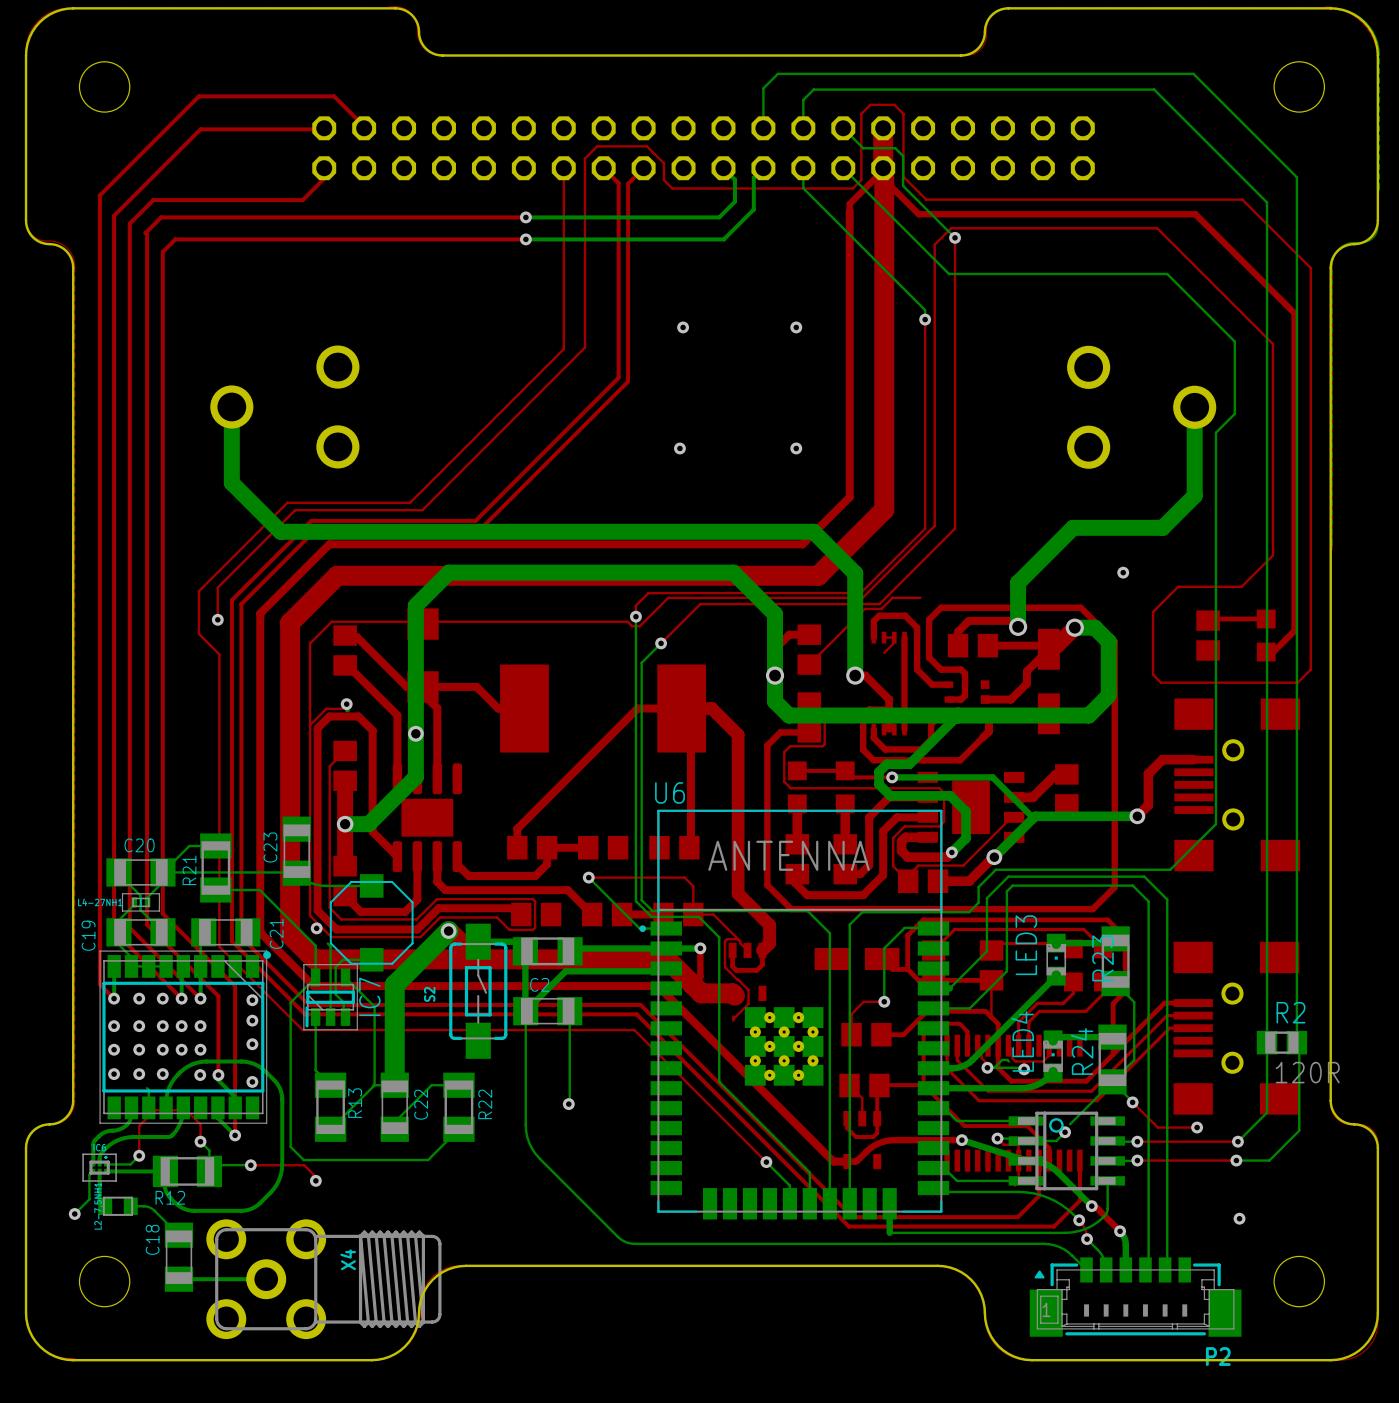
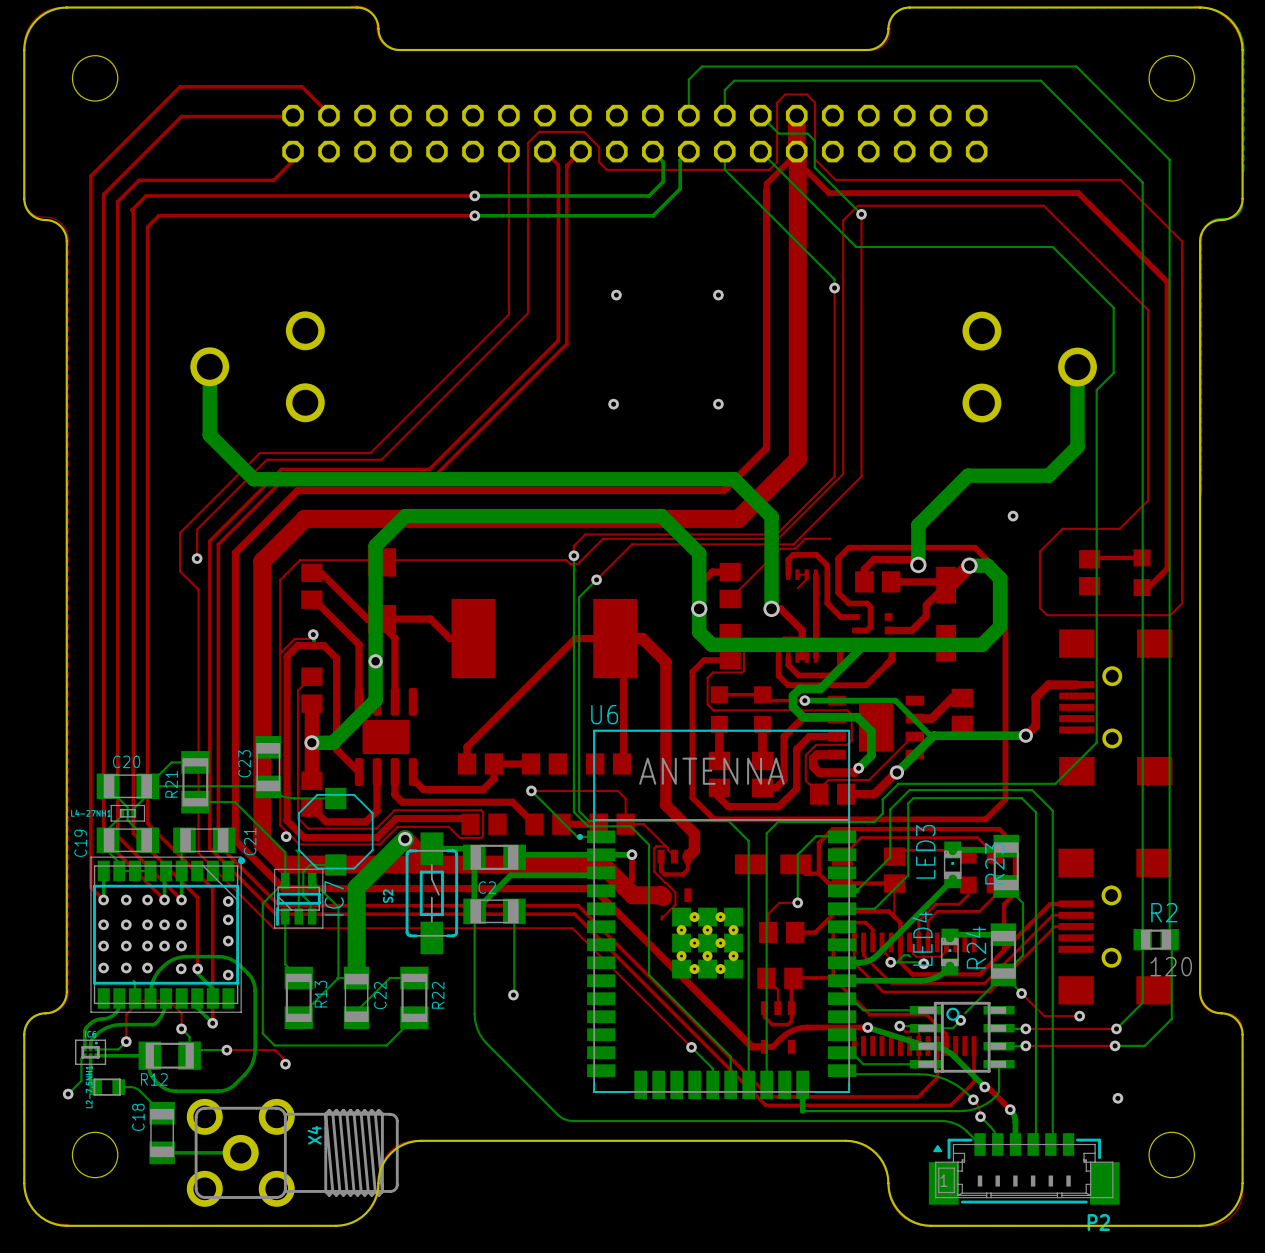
R2 value: 120R (1307, 1072) -> 120 (1171, 966)

